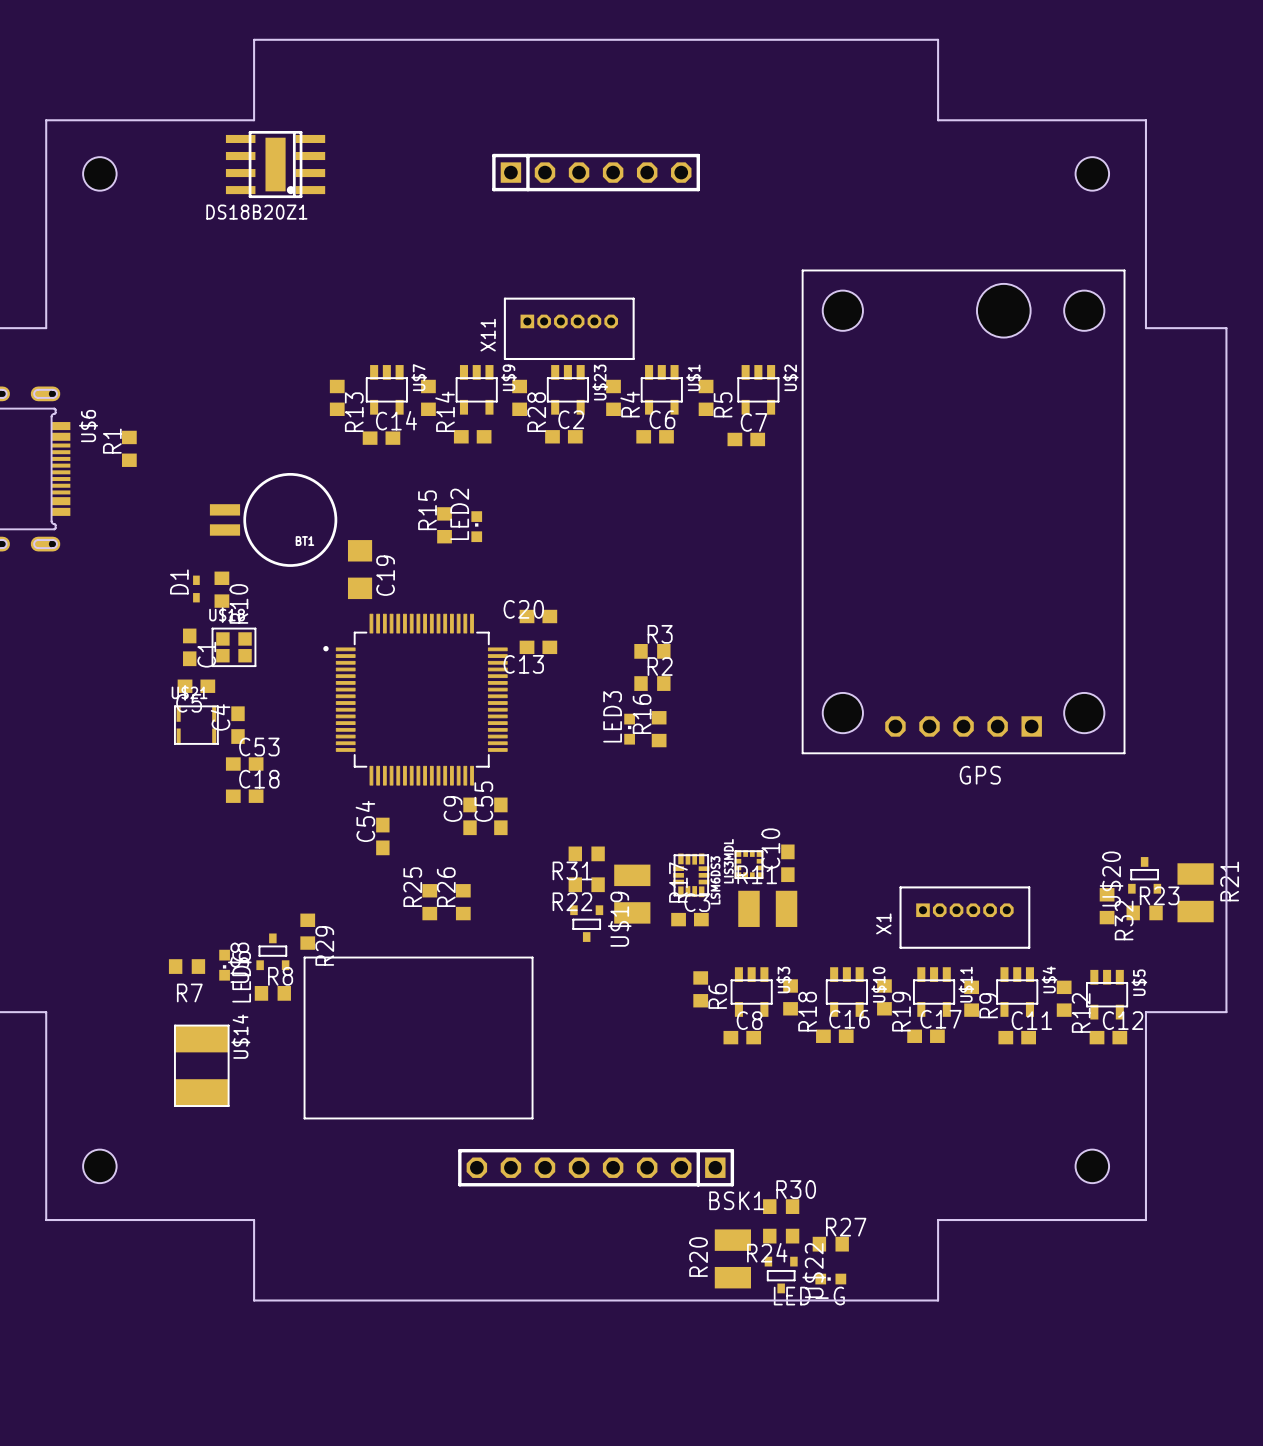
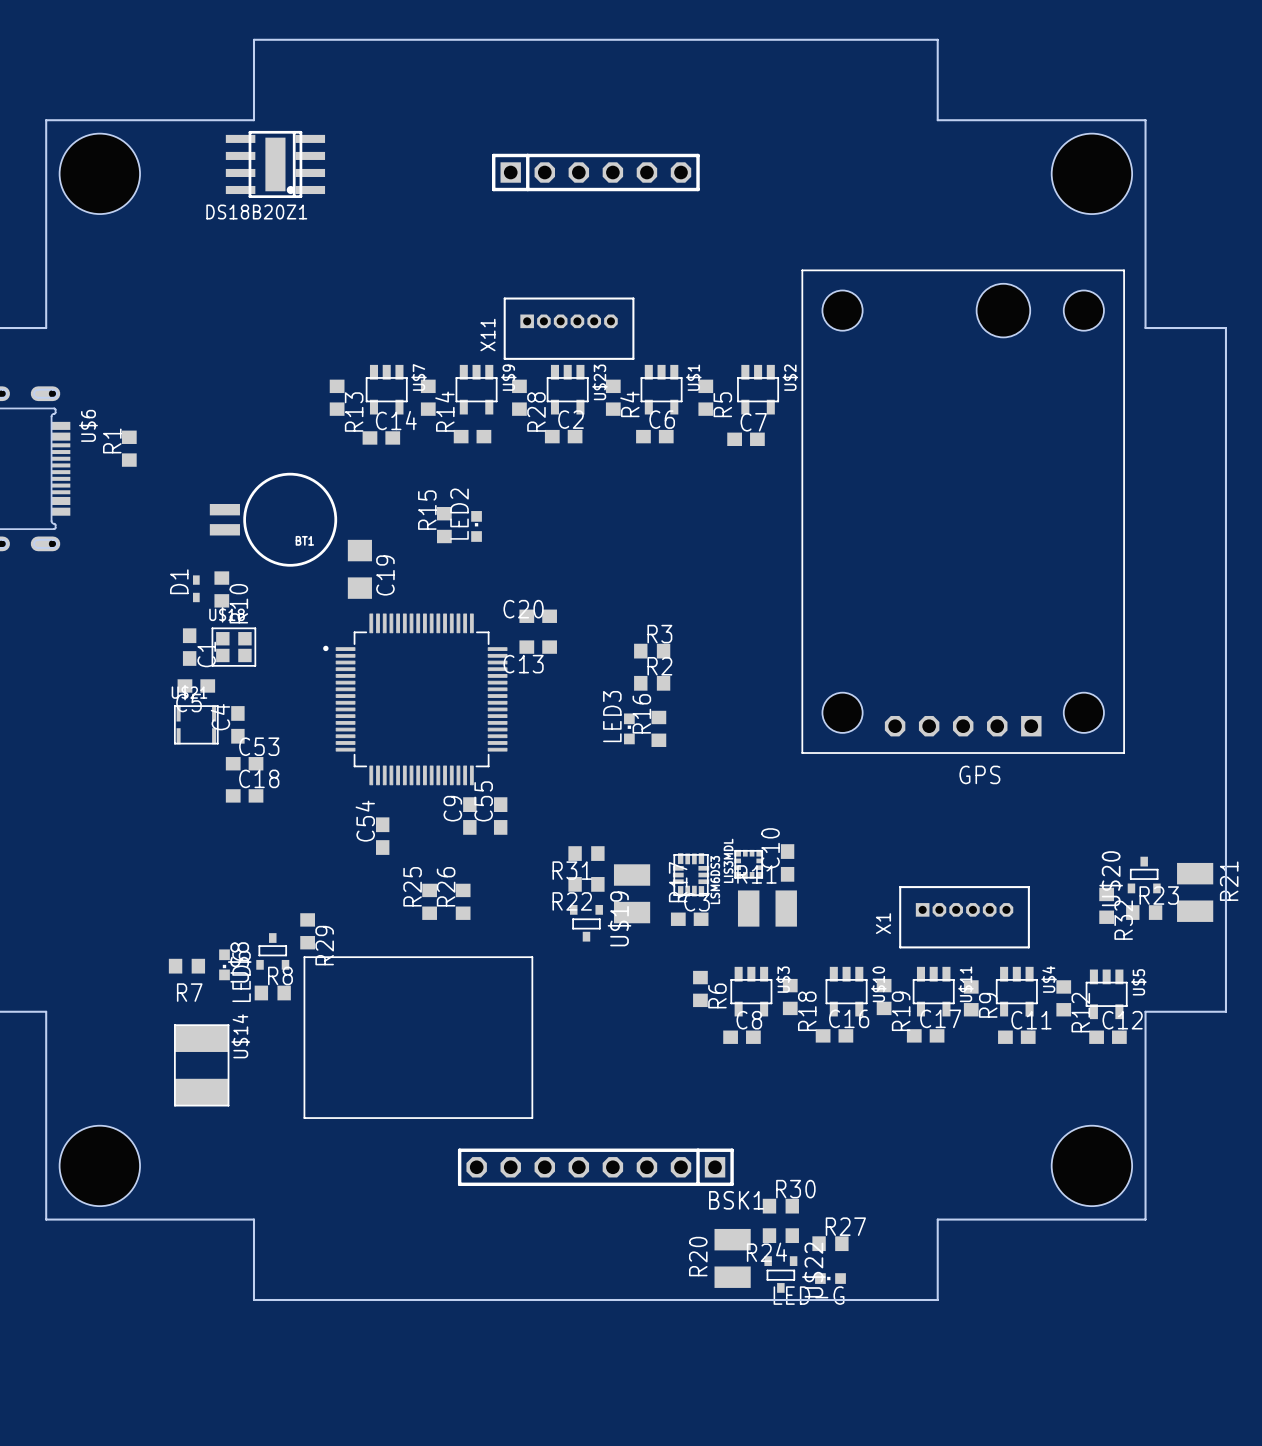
hole size: [83, 157, 117, 191] -> [59, 133, 141, 215]
hole size: [1075, 157, 1110, 191] -> [1051, 133, 1133, 215]
hole size: [83, 1149, 117, 1184] -> [59, 1125, 141, 1207]
hole size: [1075, 1149, 1110, 1184] -> [1051, 1125, 1133, 1207]

